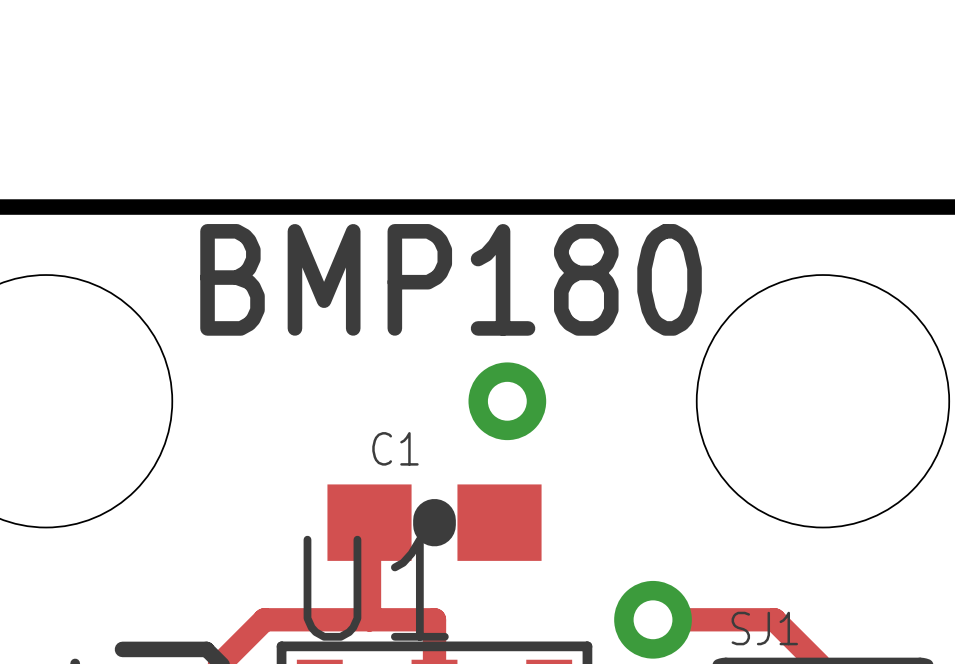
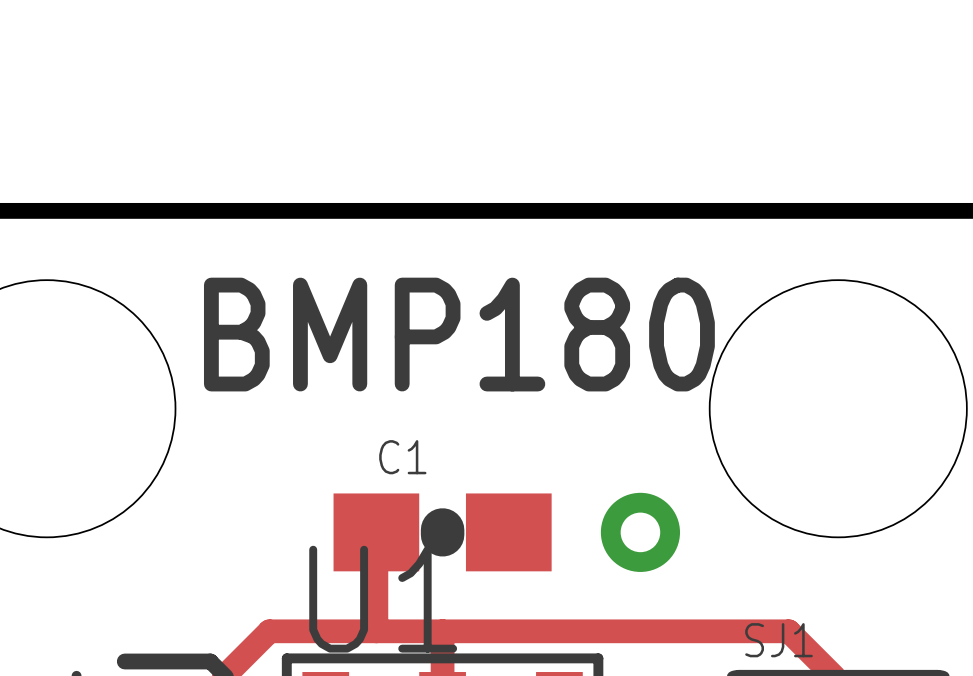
text position: BMP180 (451, 279) -> BMP180 (459, 334)
via: (507, 401) -> none
via: none -> (640, 532)
track: none -> (442, 631) (665, 631)
via: (653, 619) -> none

